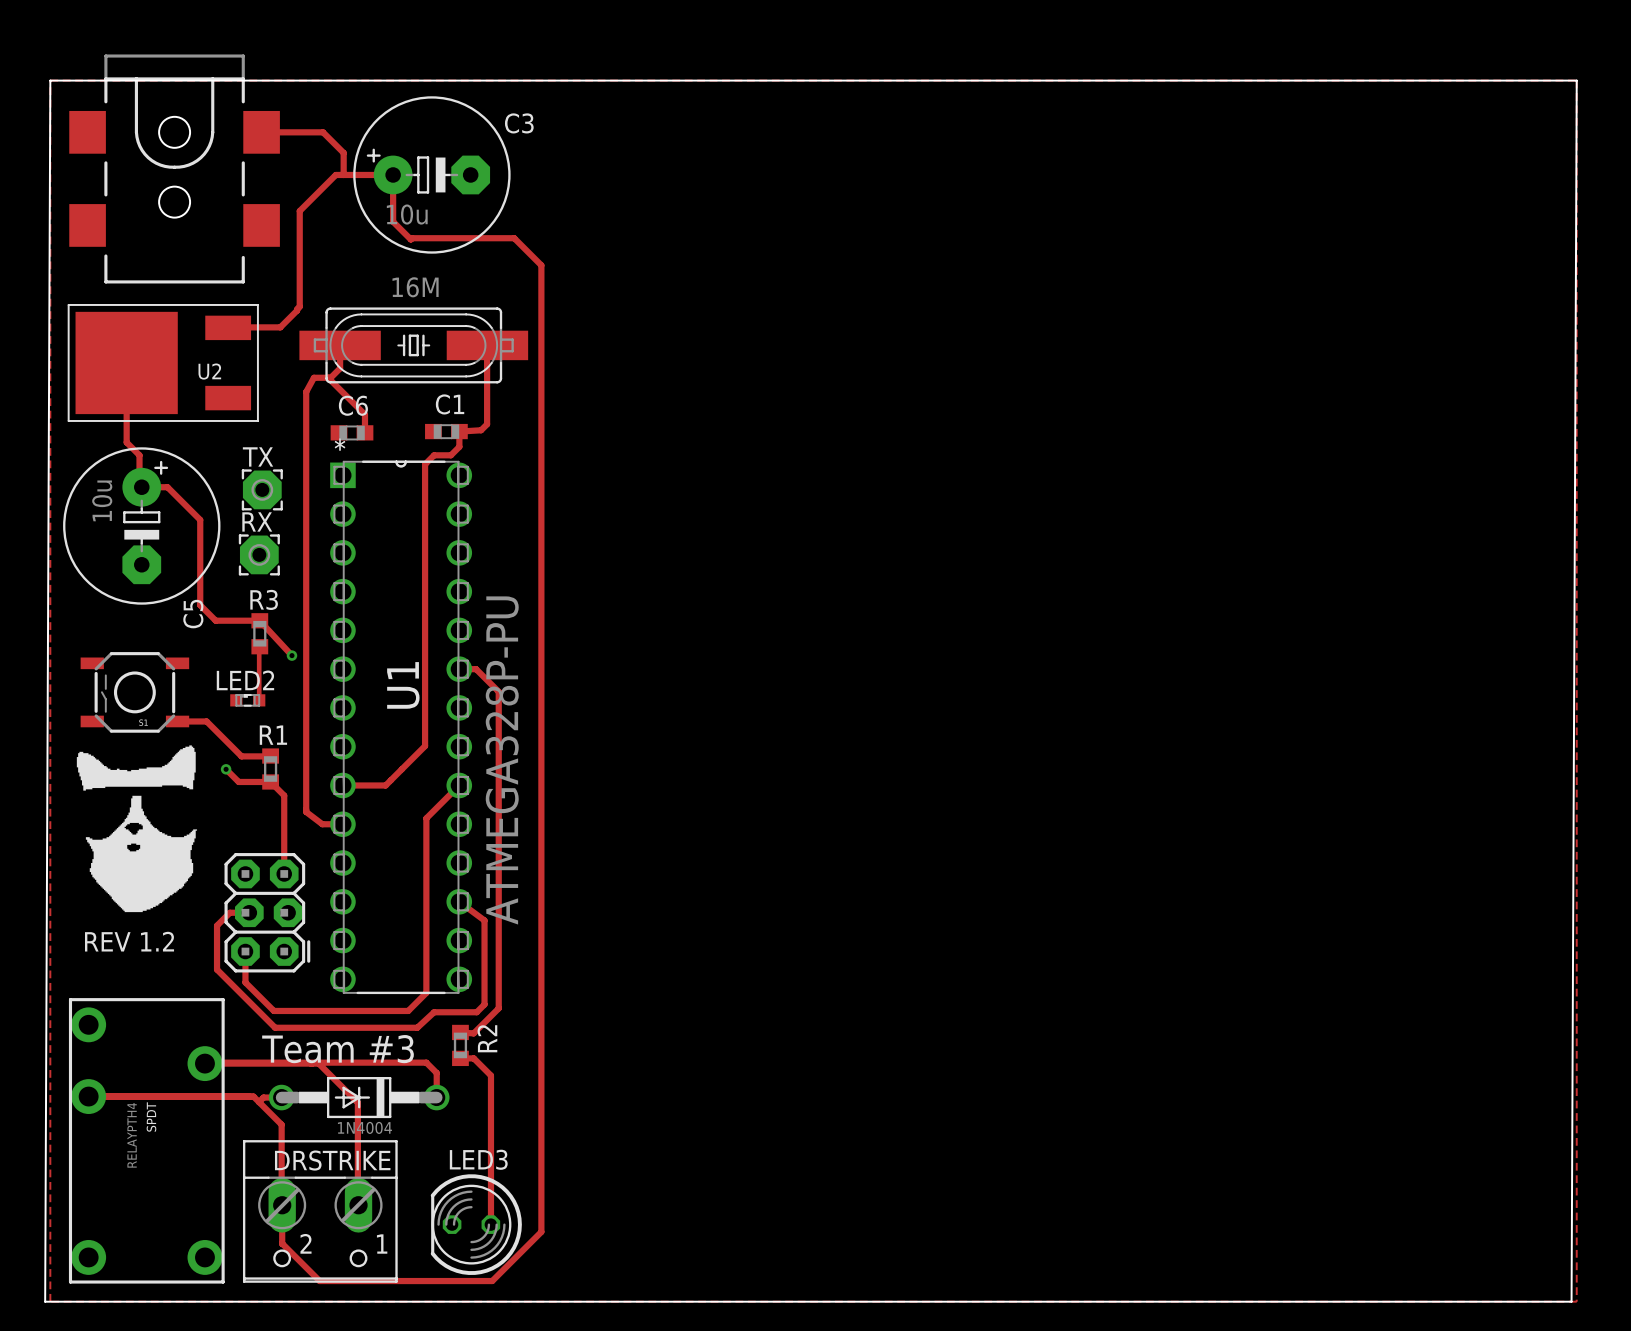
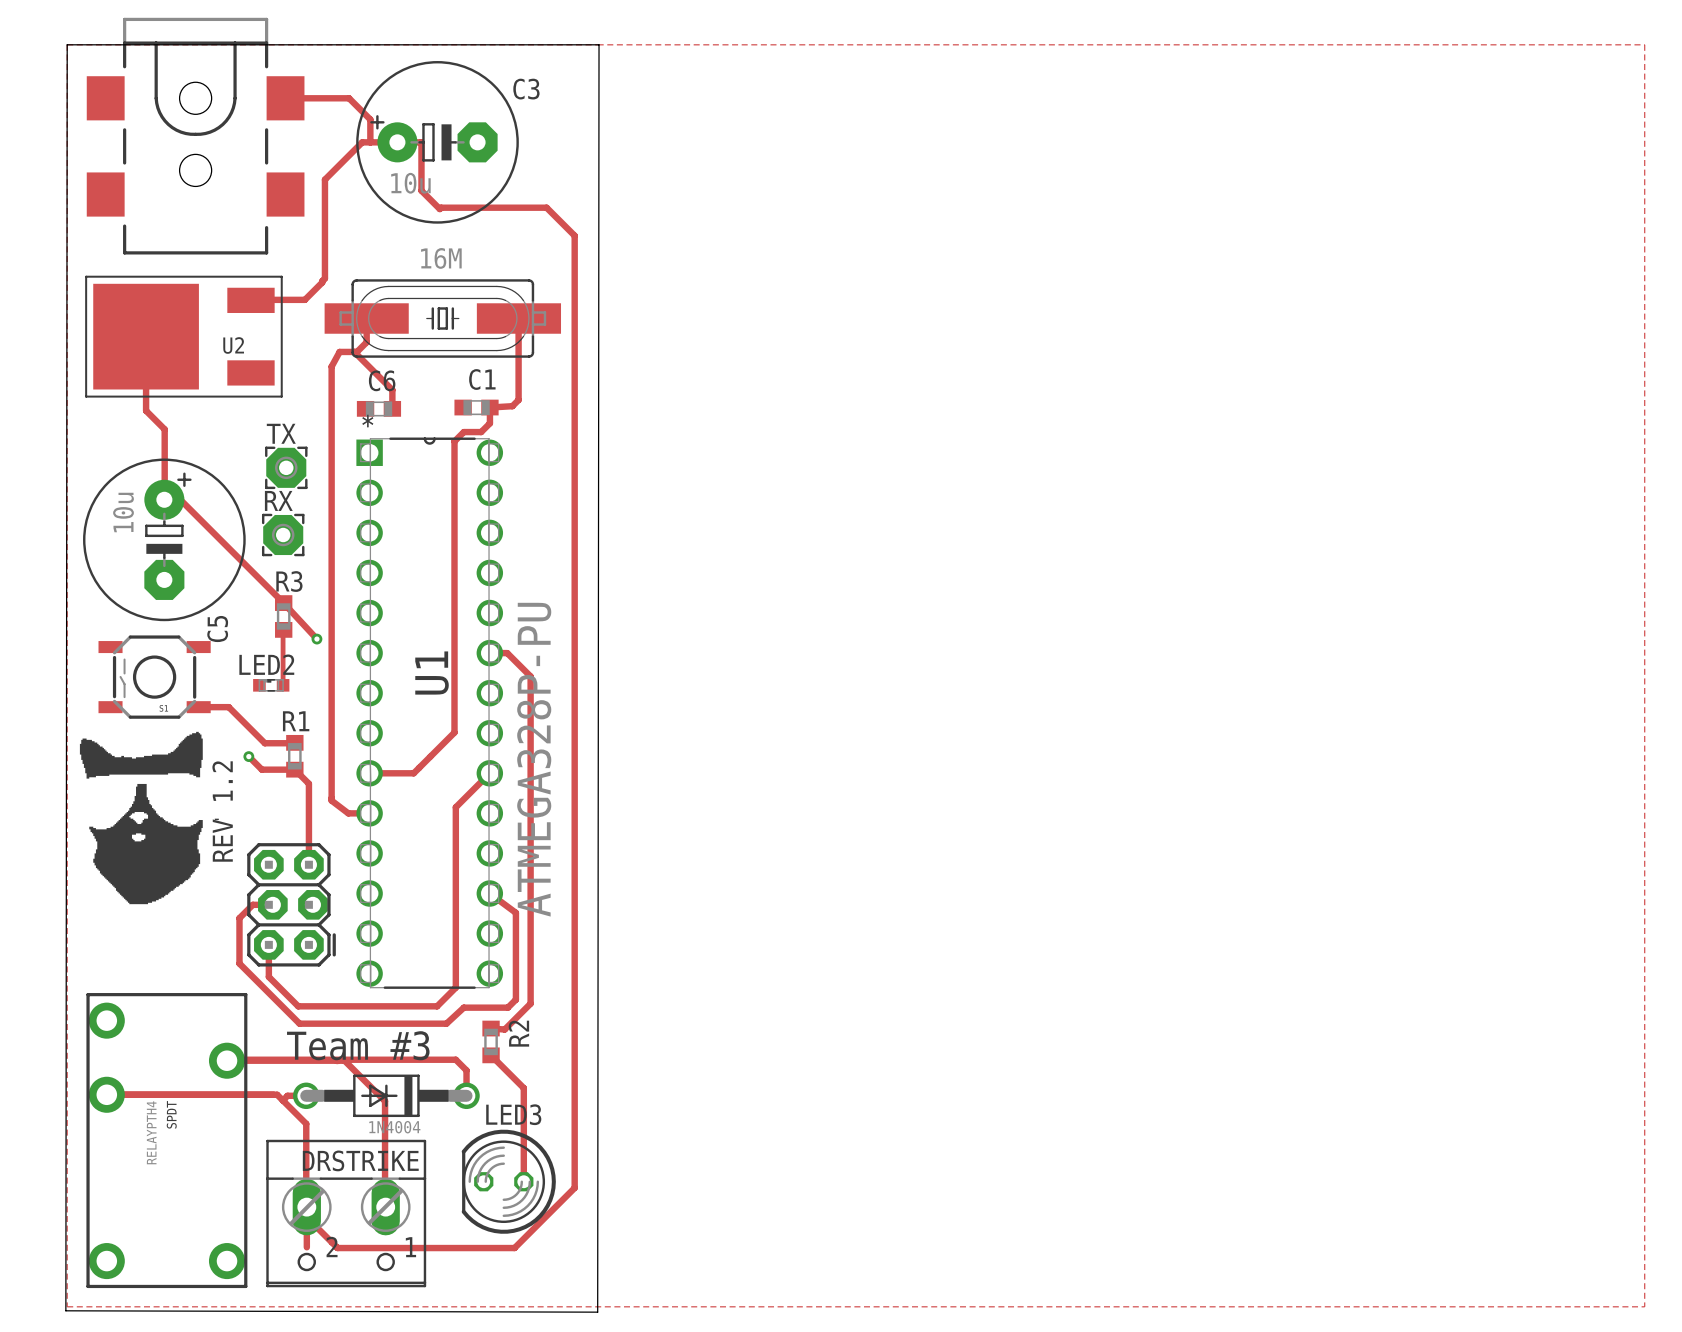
board edge: (50, 80) (45, 1301) (1571, 1301) (1576, 80) (564, 80) -> (67, 44) (65, 1310) (597, 1312) (599, 44)
C3 position: (431, 174) -> (437, 142)
track: (126, 434) (126, 442) (139, 455) (139, 484) (141, 487) (167, 487) (200, 519) (200, 605) (215, 620) (259, 620) -> (146, 410) (164, 429) (164, 499) (180, 499) (283, 603)
C5 position: (141, 526) -> (164, 539)
drawing position: (190, 746) -> (197, 732)
drawing position: (189, 747) -> (196, 733)
drawing position: (188, 748) -> (195, 735)
drawing position: (187, 749) -> (194, 736)
drawing position: (186, 751) -> (193, 737)
drawing position: (81, 752) -> (84, 739)
drawing position: (186, 752) -> (193, 739)
drawing position: (83, 753) -> (86, 740)
drawing position: (186, 753) -> (192, 740)
drawing position: (84, 755) -> (87, 741)
drawing position: (185, 755) -> (192, 741)
drawing position: (85, 756) -> (89, 743)
drawing position: (184, 756) -> (191, 743)
drawing: none -> [79, 743, 203, 865]
drawing: [76, 757, 196, 874] -> none
drawing position: (85, 757) -> (89, 744)
drawing position: (86, 758) -> (89, 745)
drawing shape: [76, 759, 99, 761] -> [79, 746, 103, 748]
drawing position: (183, 760) -> (190, 747)
drawing position: (88, 761) -> (91, 748)
drawing position: (182, 761) -> (189, 748)
drawing position: (89, 762) -> (92, 749)
drawing position: (182, 762) -> (188, 749)
drawing position: (89, 764) -> (93, 751)
drawing position: (181, 764) -> (188, 751)
drawing position: (90, 765) -> (93, 752)
drawing position: (180, 765) -> (186, 752)
drawing position: (178, 766) -> (185, 753)
drawing position: (171, 768) -> (177, 755)
drawing position: (94, 769) -> (97, 756)
drawing position: (167, 769) -> (173, 756)
drawing position: (102, 770) -> (106, 757)
drawing position: (163, 770) -> (169, 757)
drawing position: (136, 771) -> (142, 759)
drawing shape: [83, 786, 106, 789] -> [86, 774, 110, 776]
drawing position: (122, 786) -> (127, 773)
drawing position: (187, 786) -> (194, 773)
drawing position: (189, 787) -> (196, 775)
drawing position: (87, 788) -> (91, 776)
drawing position: (191, 788) -> (198, 776)
drawing position: (136, 819) -> (141, 808)
drawing shape: [124, 820, 150, 822] -> [129, 809, 155, 811]
drawing position: (136, 822) -> (142, 811)
drawing position: (125, 823) -> (130, 812)
drawing position: (121, 828) -> (125, 818)
drawing position: (148, 831) -> (154, 820)
drawing position: (193, 831) -> (200, 820)
drawing position: (193, 832) -> (200, 822)
drawing shape: [111, 833, 133, 835] -> [114, 824, 174, 826]
drawing position: (150, 833) -> (156, 823)
drawing position: (192, 833) -> (199, 823)
drawing position: (191, 835) -> (198, 824)
drawing position: (140, 836) -> (145, 826)
drawing position: (87, 837) -> (91, 827)
drawing position: (151, 837) -> (156, 827)
drawing position: (148, 839) -> (154, 828)
drawing position: (140, 842) -> (146, 832)
drawing position: (110, 844) -> (114, 834)
drawing position: (165, 849) -> (171, 839)
drawing position: (163, 850) -> (169, 840)
drawing position: (141, 873) -> (146, 864)
drawing shape: [92, 874, 192, 876] -> [95, 865, 199, 867]
drawing position: (141, 876) -> (146, 867)
drawing position: (141, 877) -> (146, 868)
drawing position: (141, 879) -> (146, 870)
drawing position: (142, 880) -> (147, 871)
drawing position: (141, 881) -> (146, 872)
drawing position: (141, 883) -> (146, 874)
drawing position: (141, 884) -> (146, 875)
drawing position: (142, 885) -> (147, 876)
drawing position: (142, 886) -> (147, 878)
drawing position: (142, 888) -> (147, 879)
drawing position: (141, 889) -> (146, 880)
drawing position: (141, 890) -> (146, 882)
drawing position: (141, 892) -> (146, 883)
drawing position: (140, 893) -> (146, 884)
drawing position: (140, 894) -> (146, 886)
drawing position: (140, 895) -> (145, 887)
drawing position: (140, 897) -> (145, 888)
drawing position: (139, 898) -> (144, 890)
drawing position: (138, 899) -> (144, 891)
drawing position: (138, 901) -> (144, 892)
drawing position: (138, 902) -> (144, 894)
drawing position: (138, 903) -> (143, 895)
drawing position: (138, 904) -> (143, 896)
drawing position: (137, 906) -> (142, 898)
drawing position: (136, 907) -> (142, 899)
drawing position: (136, 908) -> (141, 900)
drawing position: (135, 910) -> (140, 902)
drawing position: (133, 911) -> (138, 903)
text rotation: 0° (129, 941) -> 90° counterclockwise (222, 811)
text position: REV 1.2 (129, 941) -> REV 1.2 (222, 811)
track: (460, 1058) (473, 1058) (490, 1075) (490, 1224) -> (491, 1055) (523, 1088) (523, 1181)
track: (541, 1186) (541, 1231) (492, 1281) (319, 1281) (282, 1243) -> (574, 1187) (514, 1248) (337, 1248) (306, 1217)
LED3 position: (476, 1224) -> (508, 1181)

